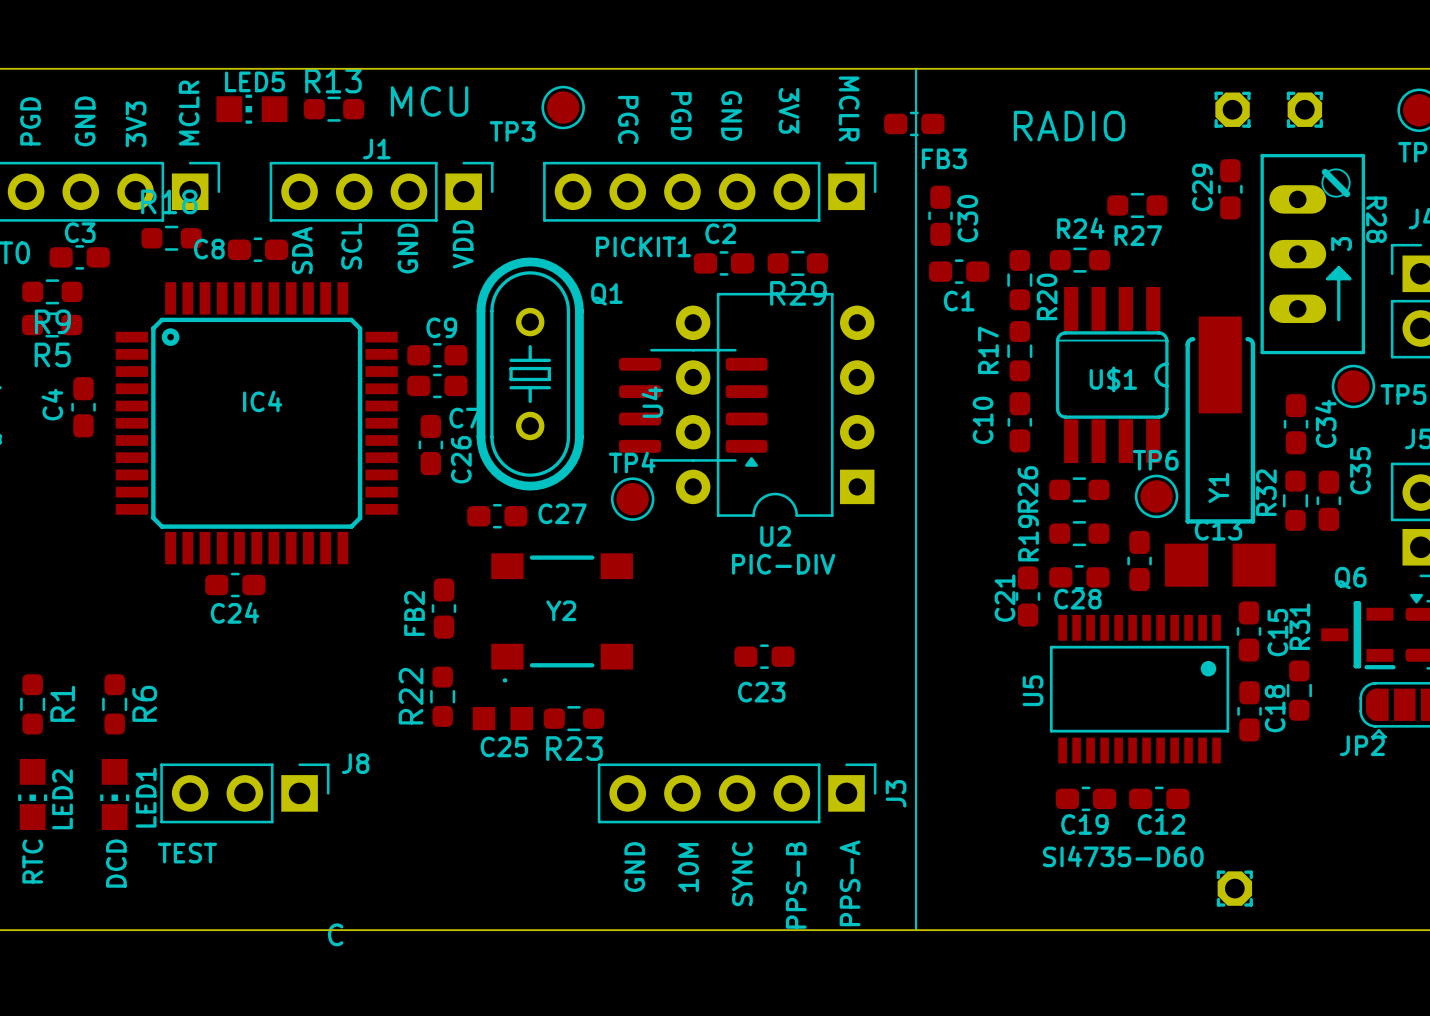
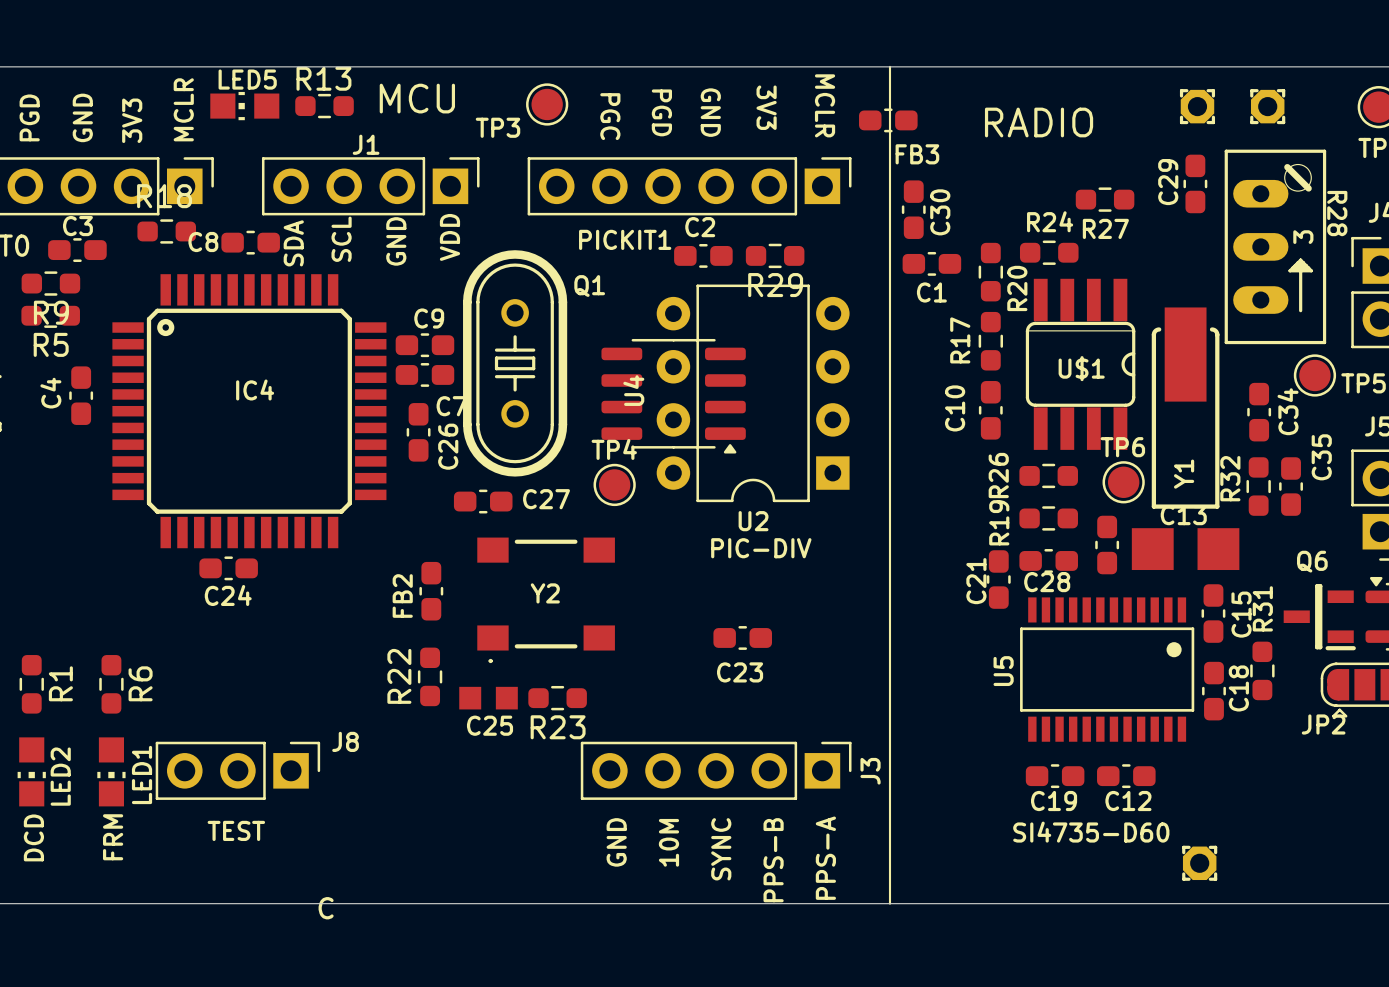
text position: TEST (187, 853) -> TEST (236, 830)
text: RTC (32, 861) -> none
text: none -> FRM (113, 837)
text position: DCD (116, 863) -> DCD (33, 837)

